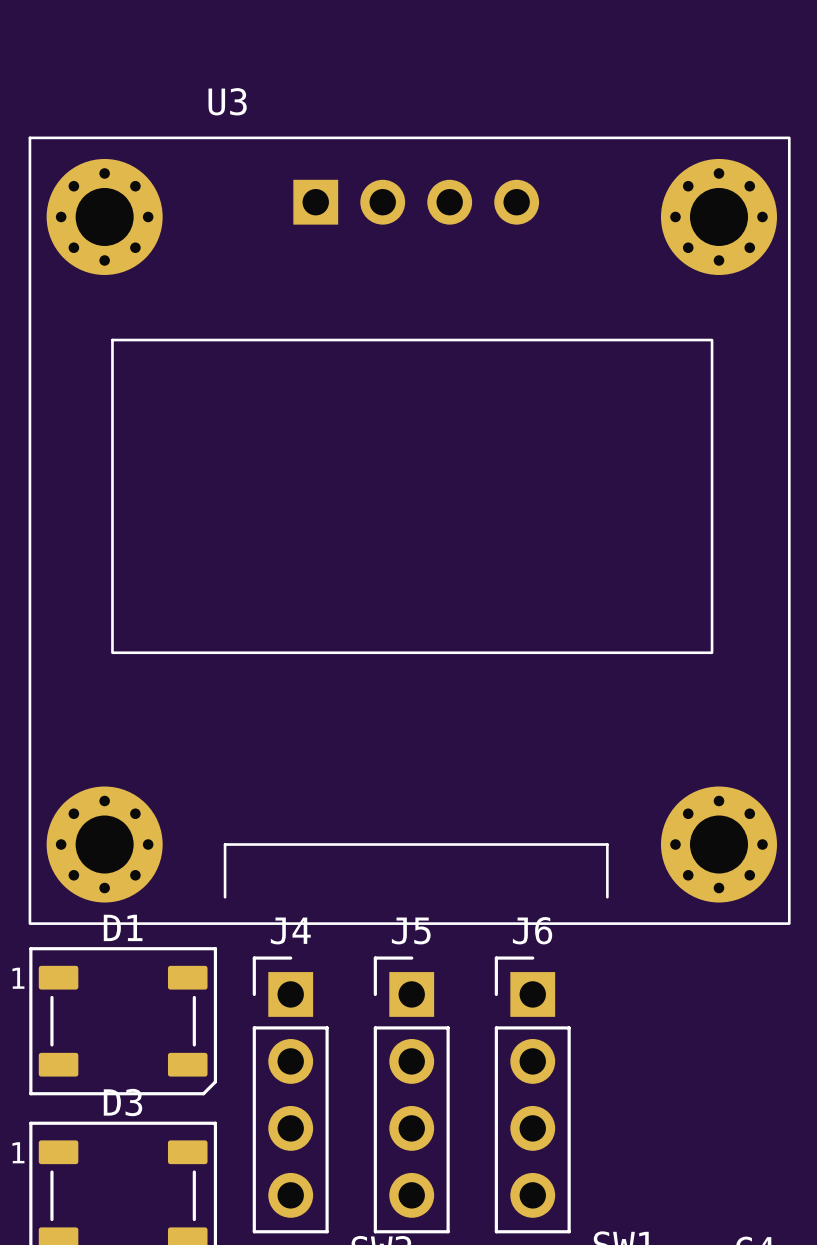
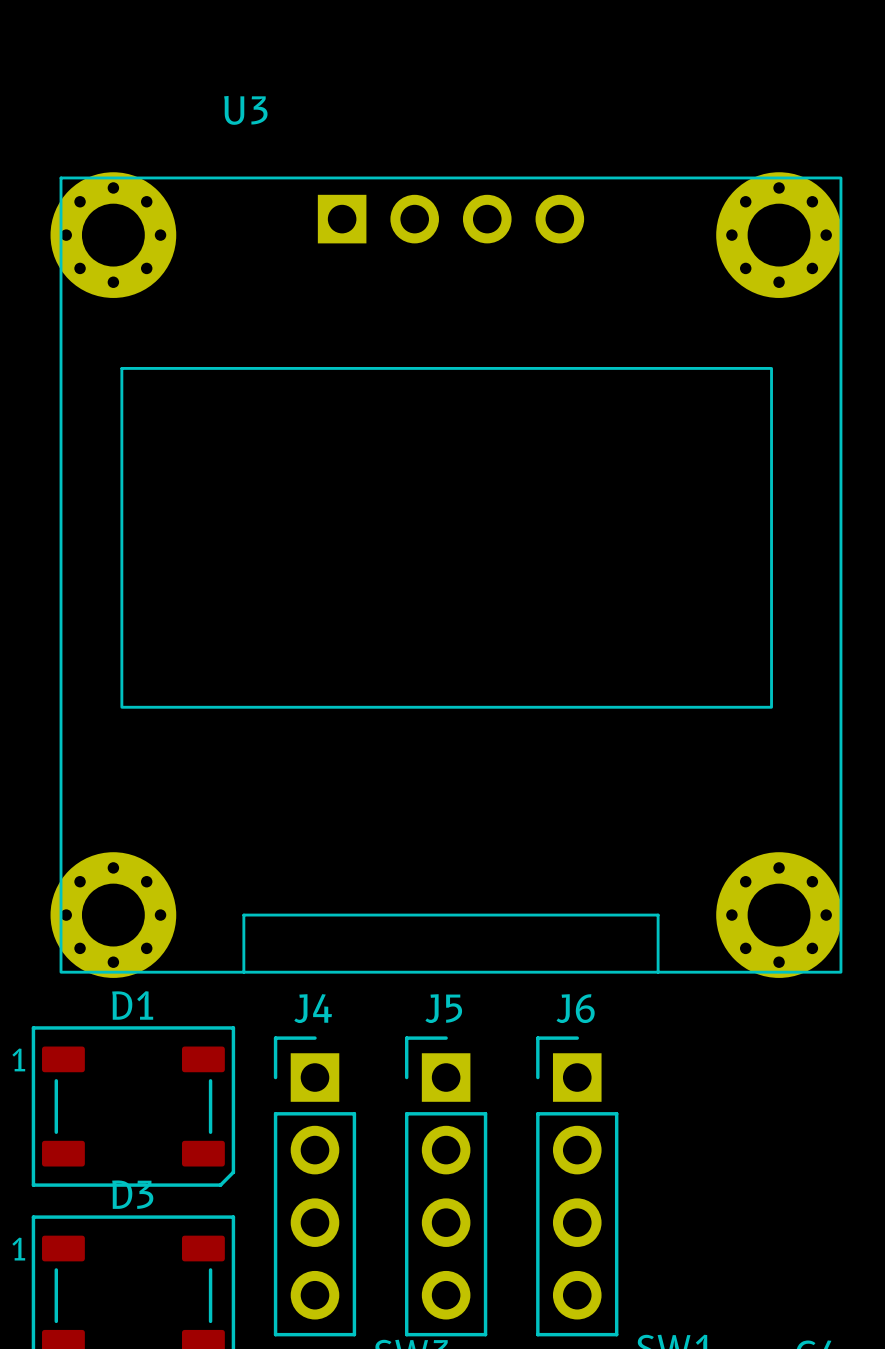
U3 footprint: [28, 136, 791, 925] -> [50, 172, 843, 978]

